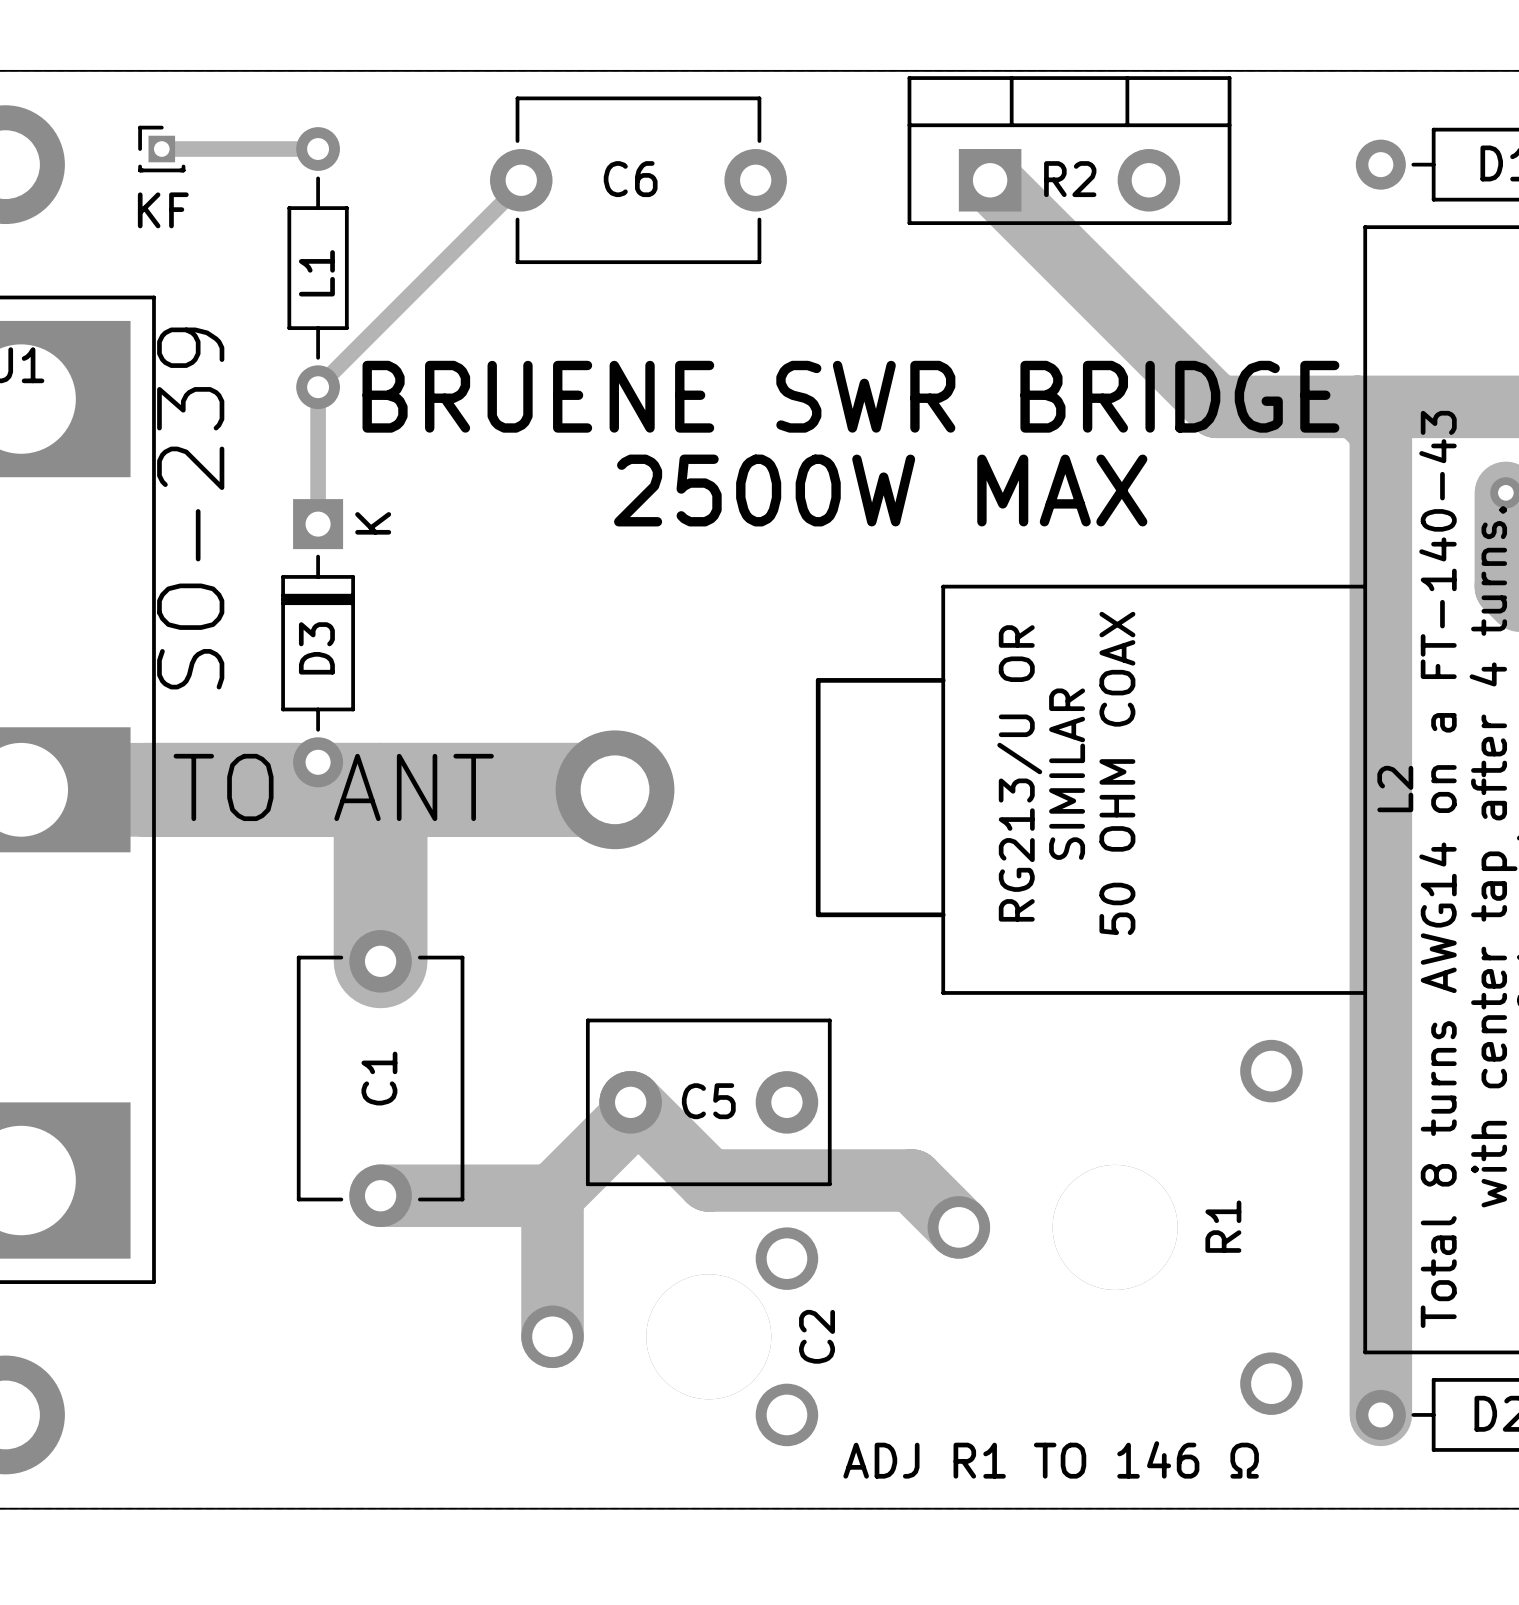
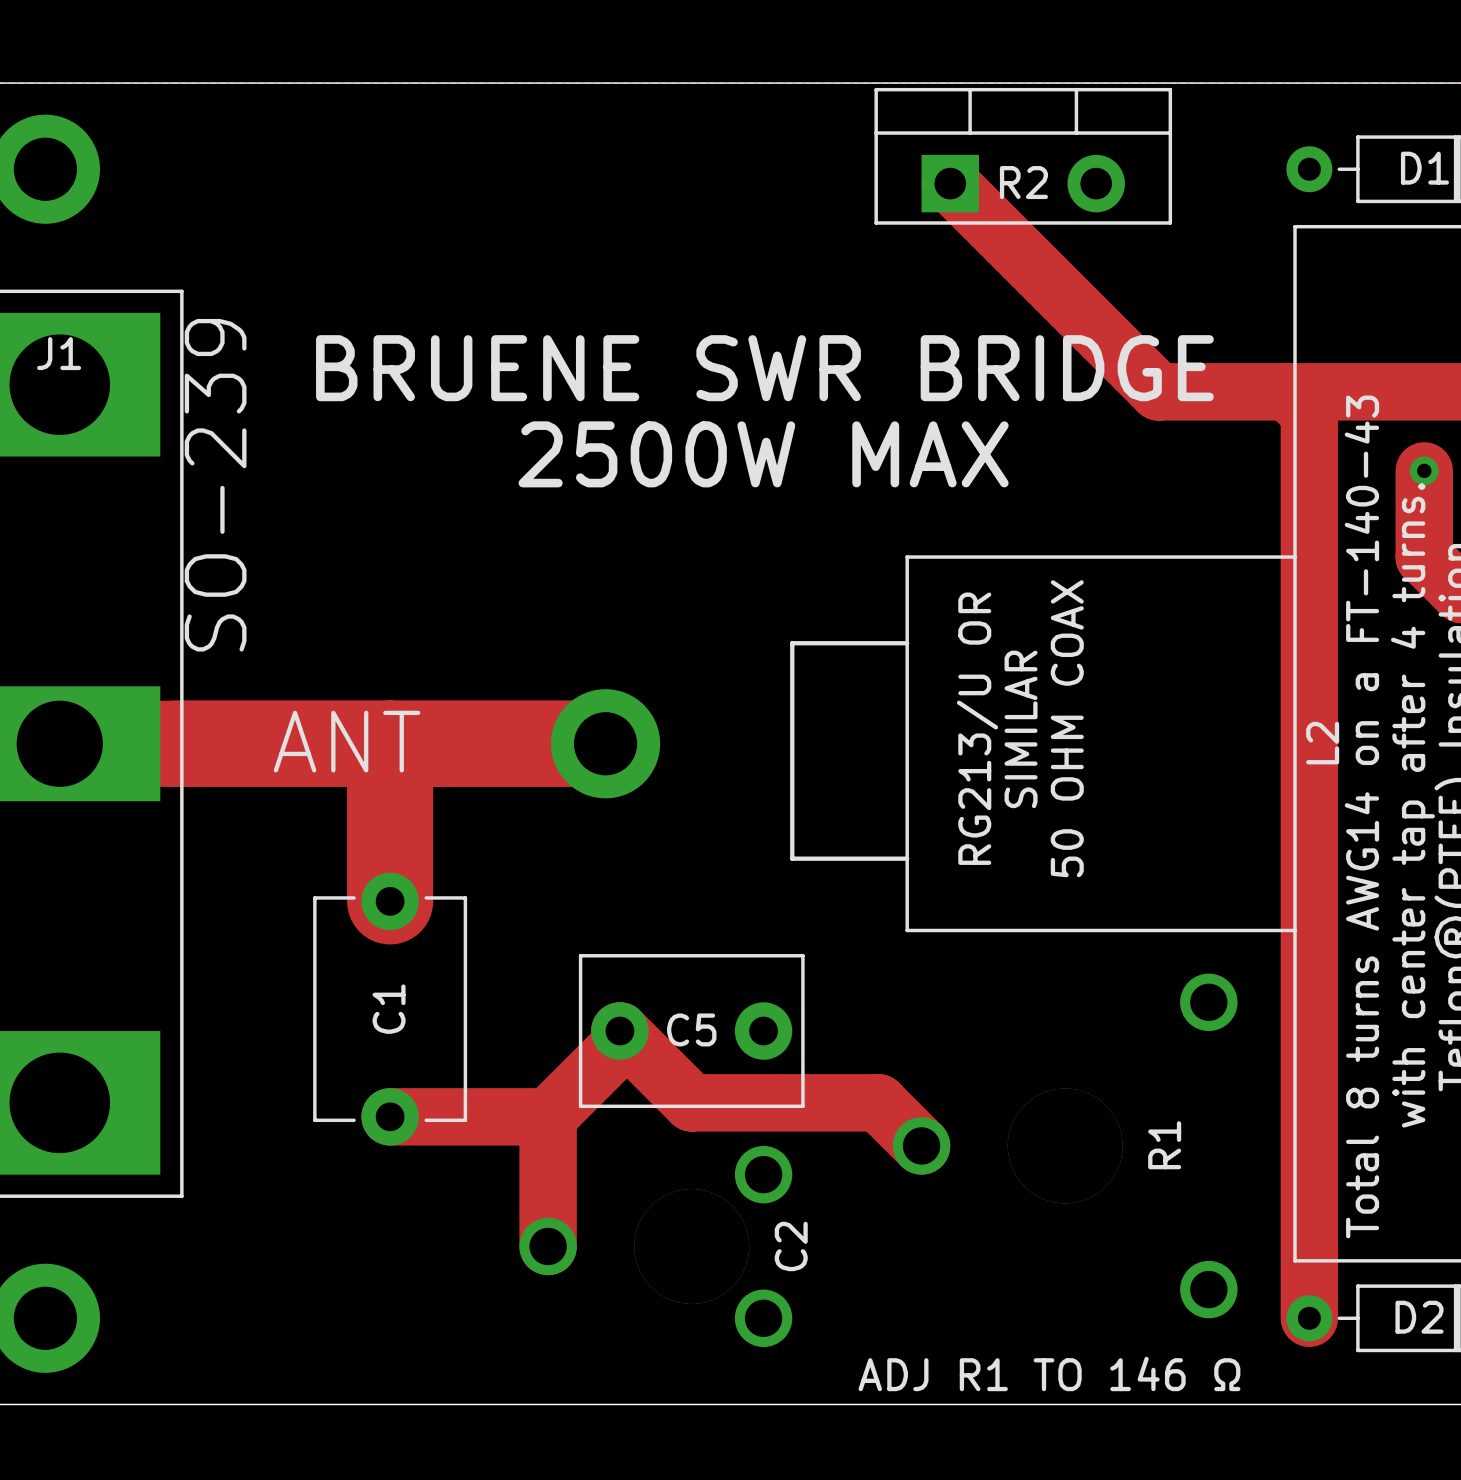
track: (161, 149) (318, 149) -> none
part: (161, 149) -> none
track: (521, 180) (521, 184) (318, 387) (318, 524) -> none
C6: (638, 180) -> none
text: KF (163, 210) -> none
L1: (318, 268) -> none
text position: BRUENE SWR BRIDGE (850, 396) -> BRUENE SWR BRIDGE (764, 368)
text position: 2500W MAX (880, 490) -> 2500W MAX (763, 454)
D3: (318, 643) -> none
text: TO ANT (333, 787) -> ANT (347, 741)
text position: ADJ R1 TO 146 Ω (1051, 1459) -> ADJ R1 TO 146 Ω (1049, 1373)

